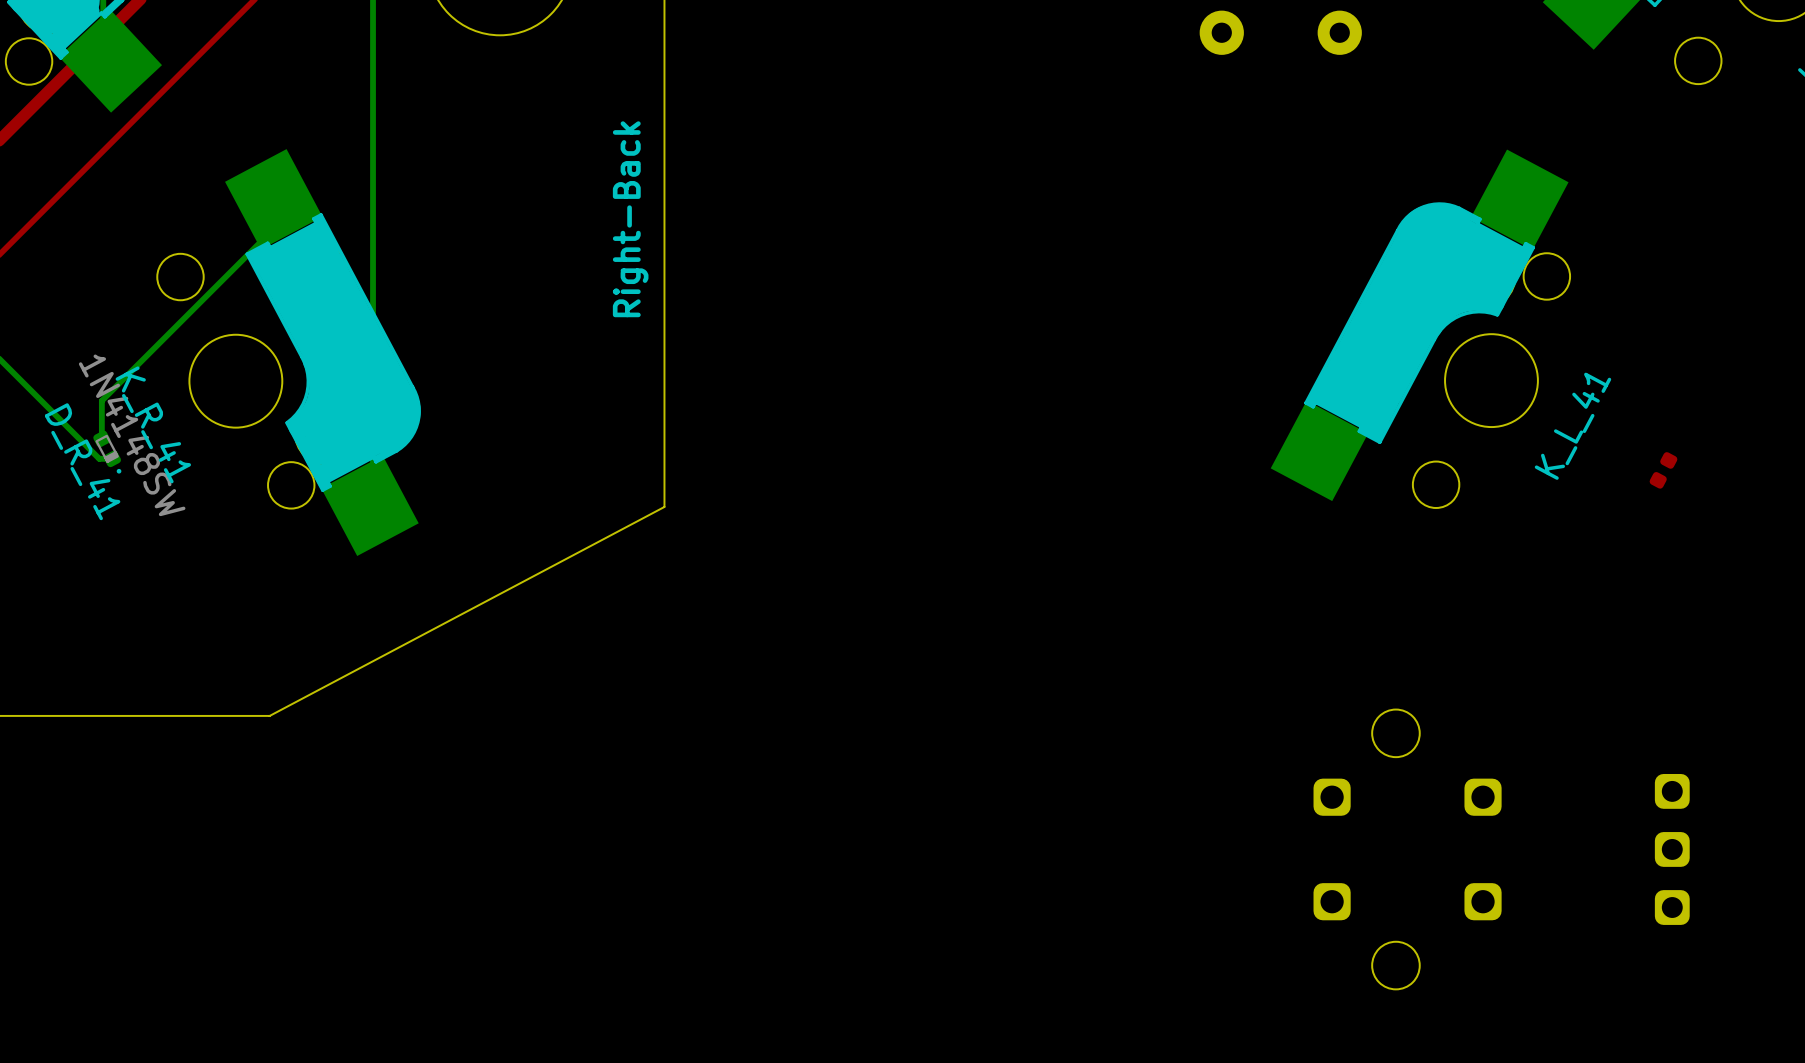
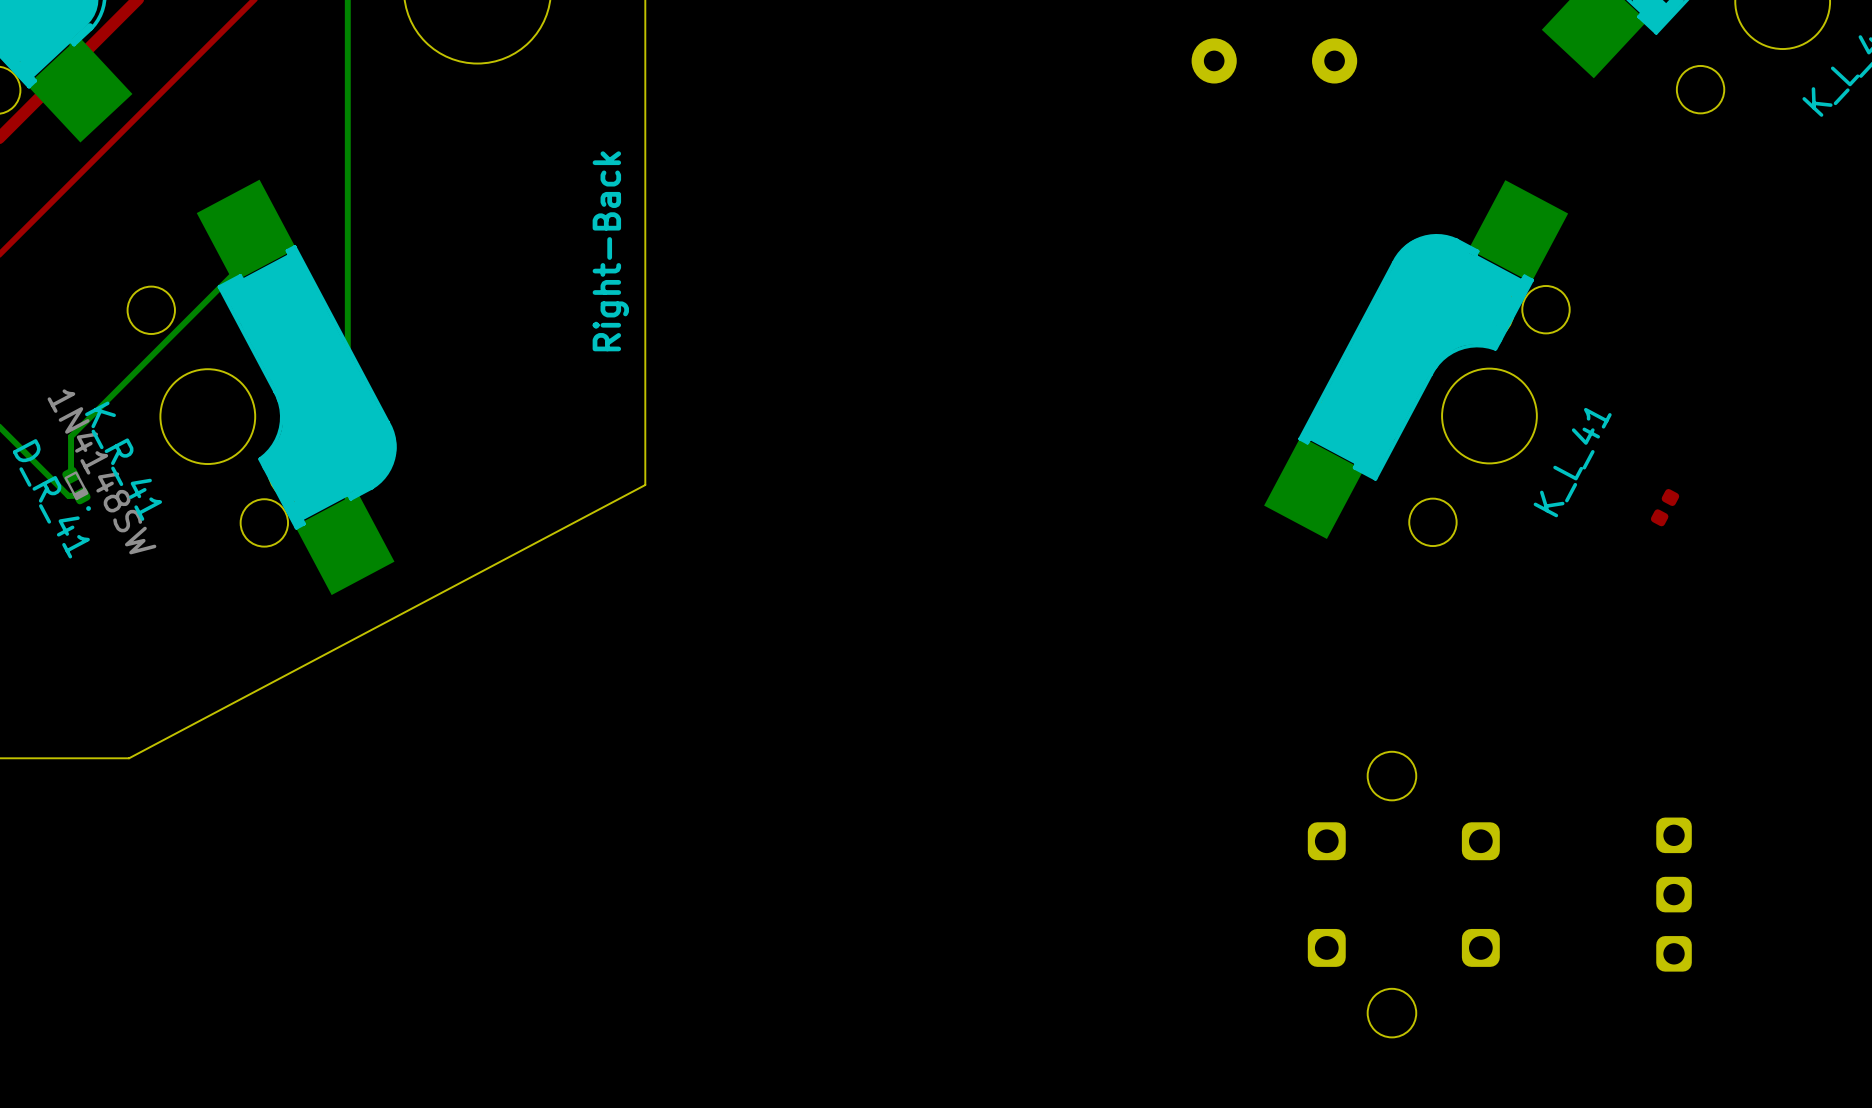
board edge: (664, 448) (664, 506) (269, 715) (158, 715) -> (645, 485) (129, 758)

